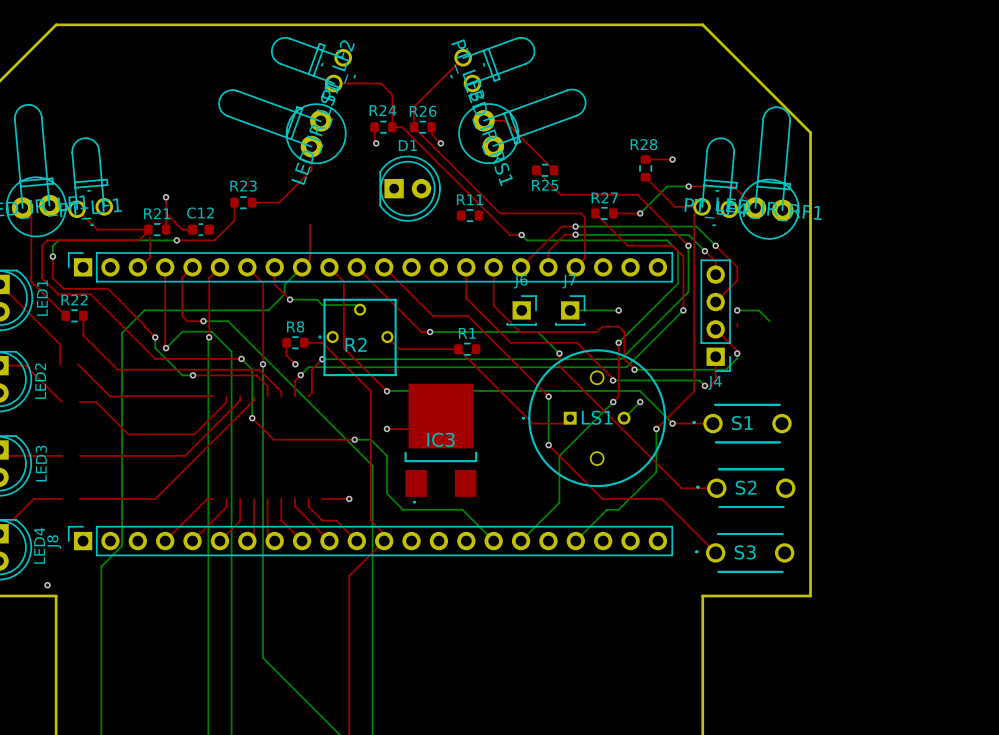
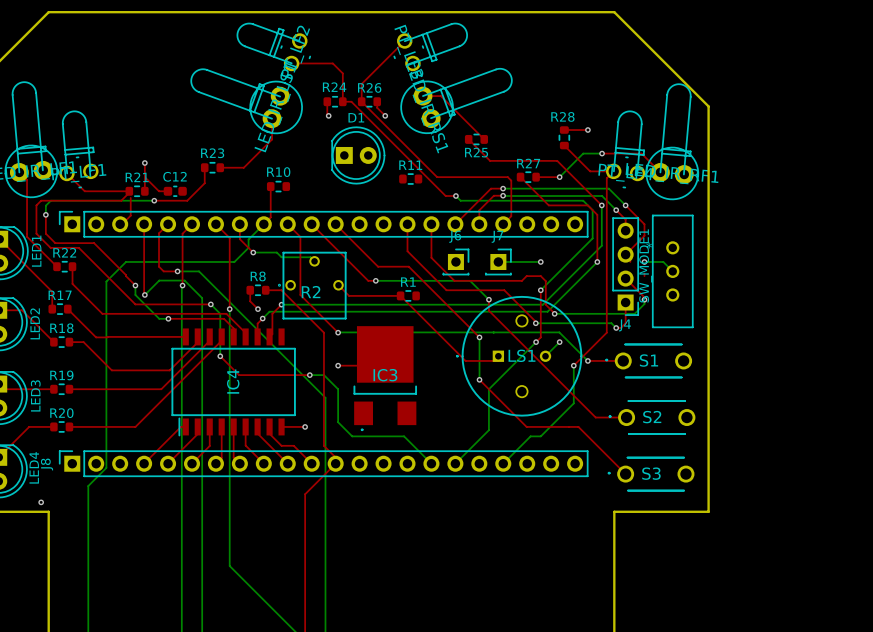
R10: none -> (278, 186)
SW_MODE1: none -> (672, 271)
R17: none -> (60, 309)
R18: none -> (61, 342)
IC4: none -> (233, 382)
R19: none -> (61, 389)
R20: none -> (61, 426)

